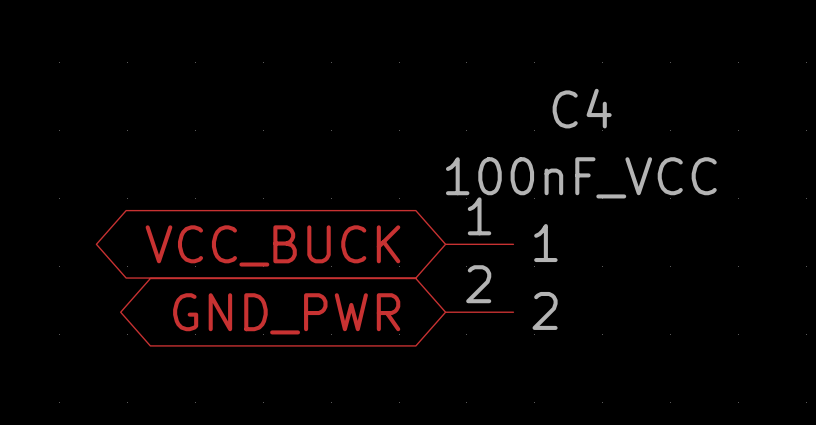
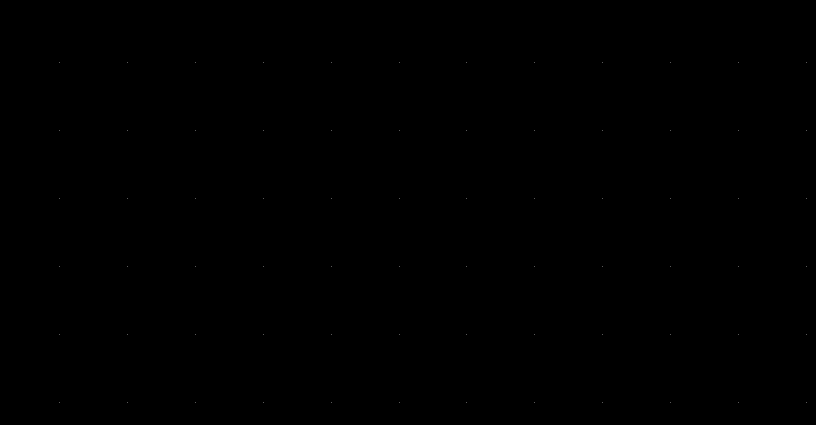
global label: VCC_BUCK (272, 245) -> none
C4: 100nF_VCC (479, 278) -> none
global label: GND_PWR (286, 313) -> none

